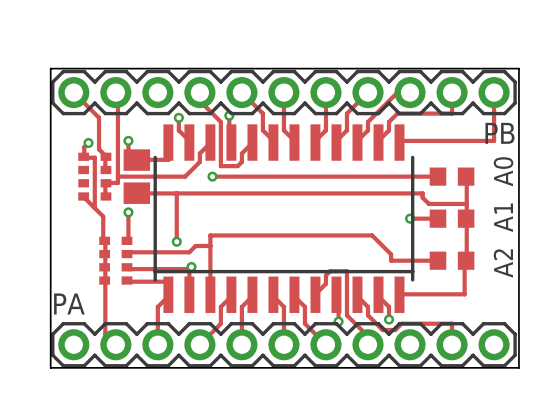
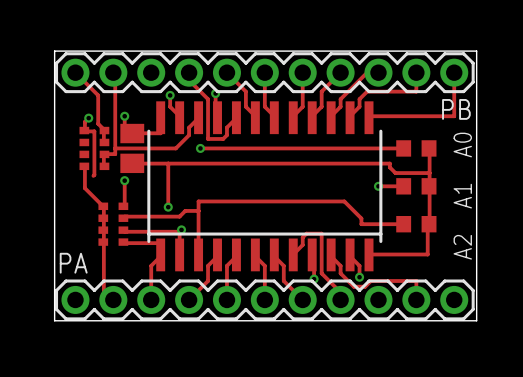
track: (84, 197) (103, 216) (103, 239) -> (84, 167) (84, 188) (101, 205)

